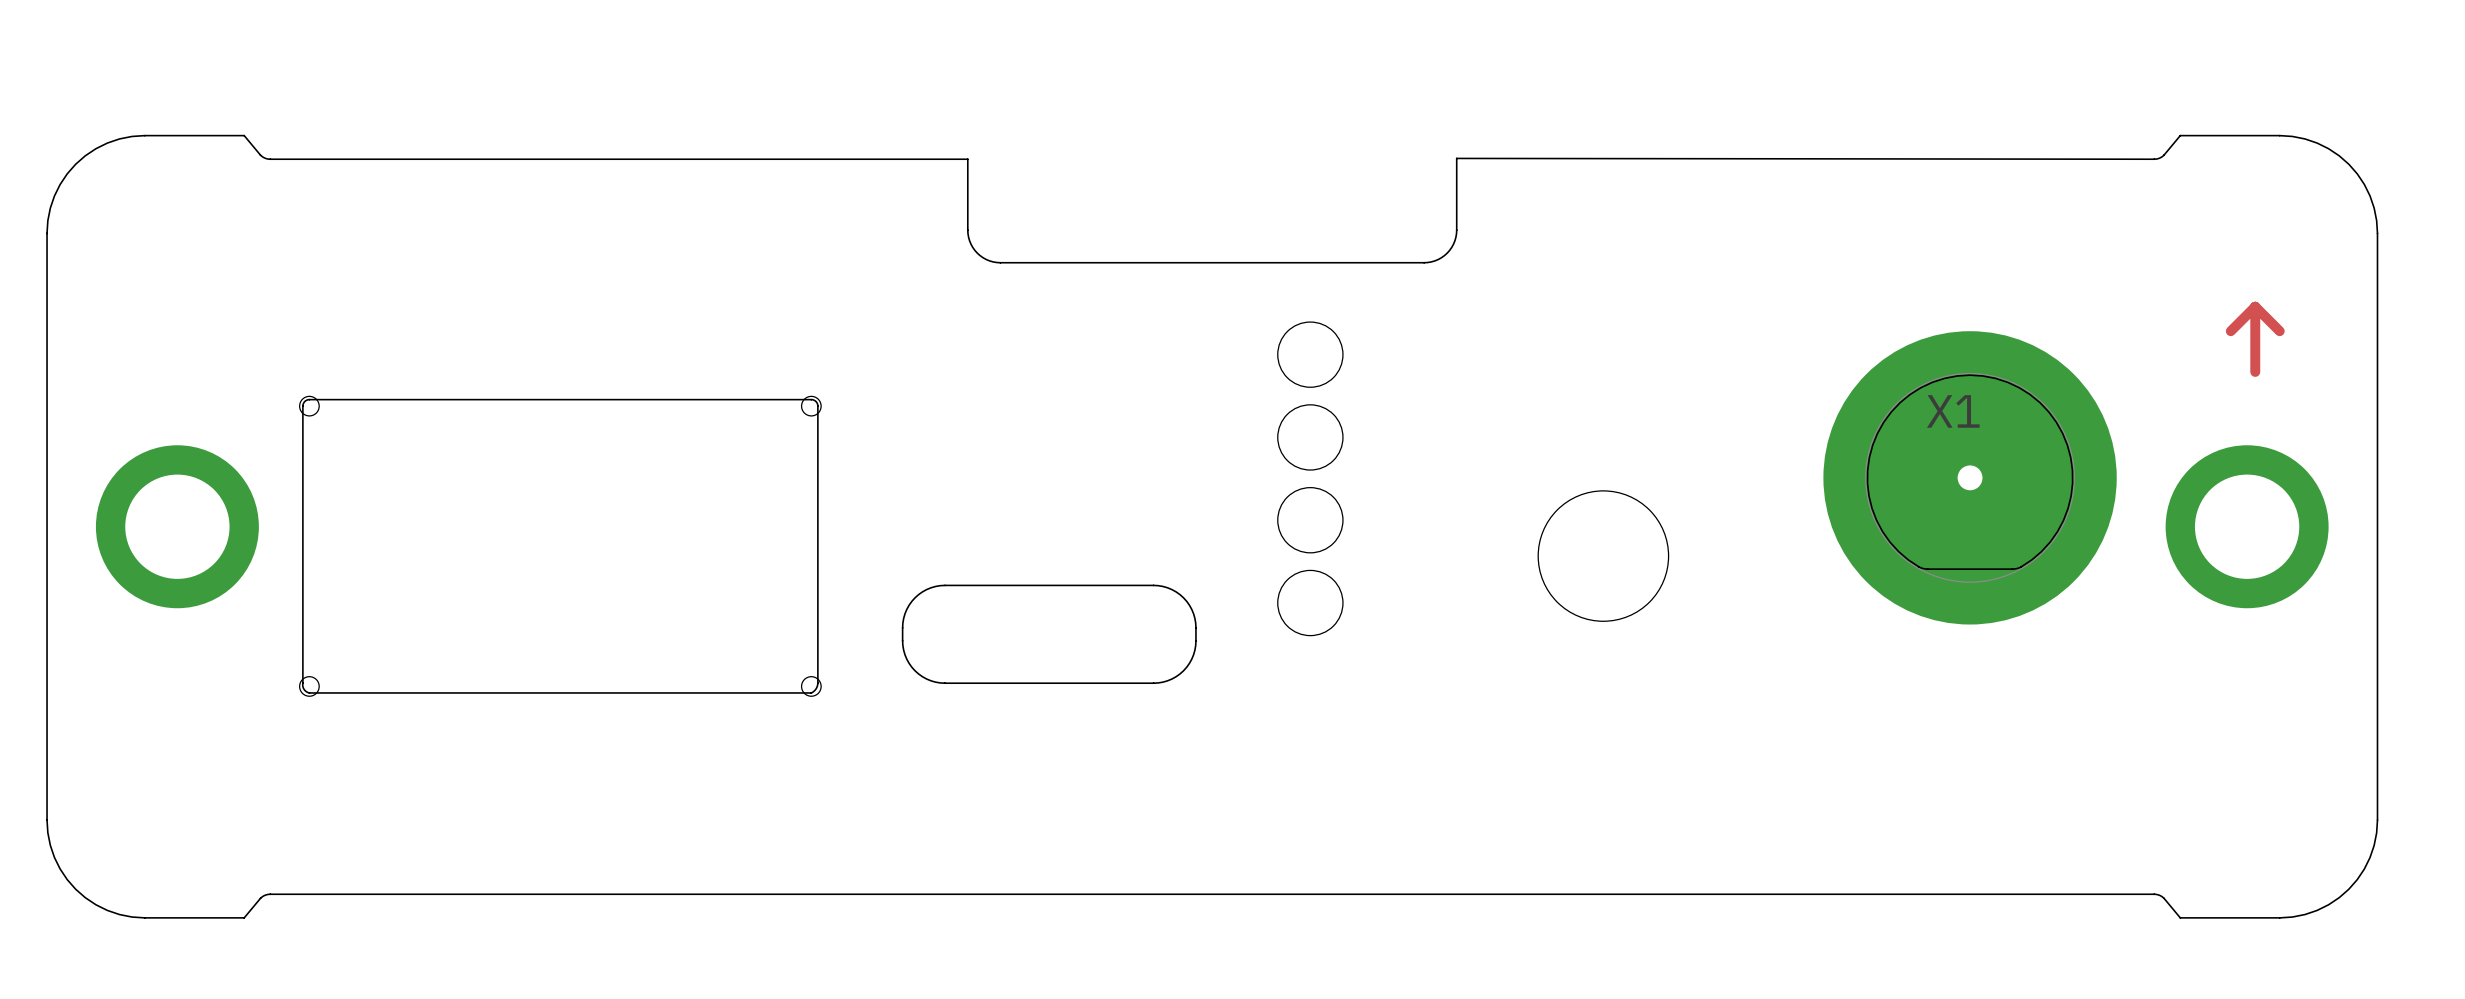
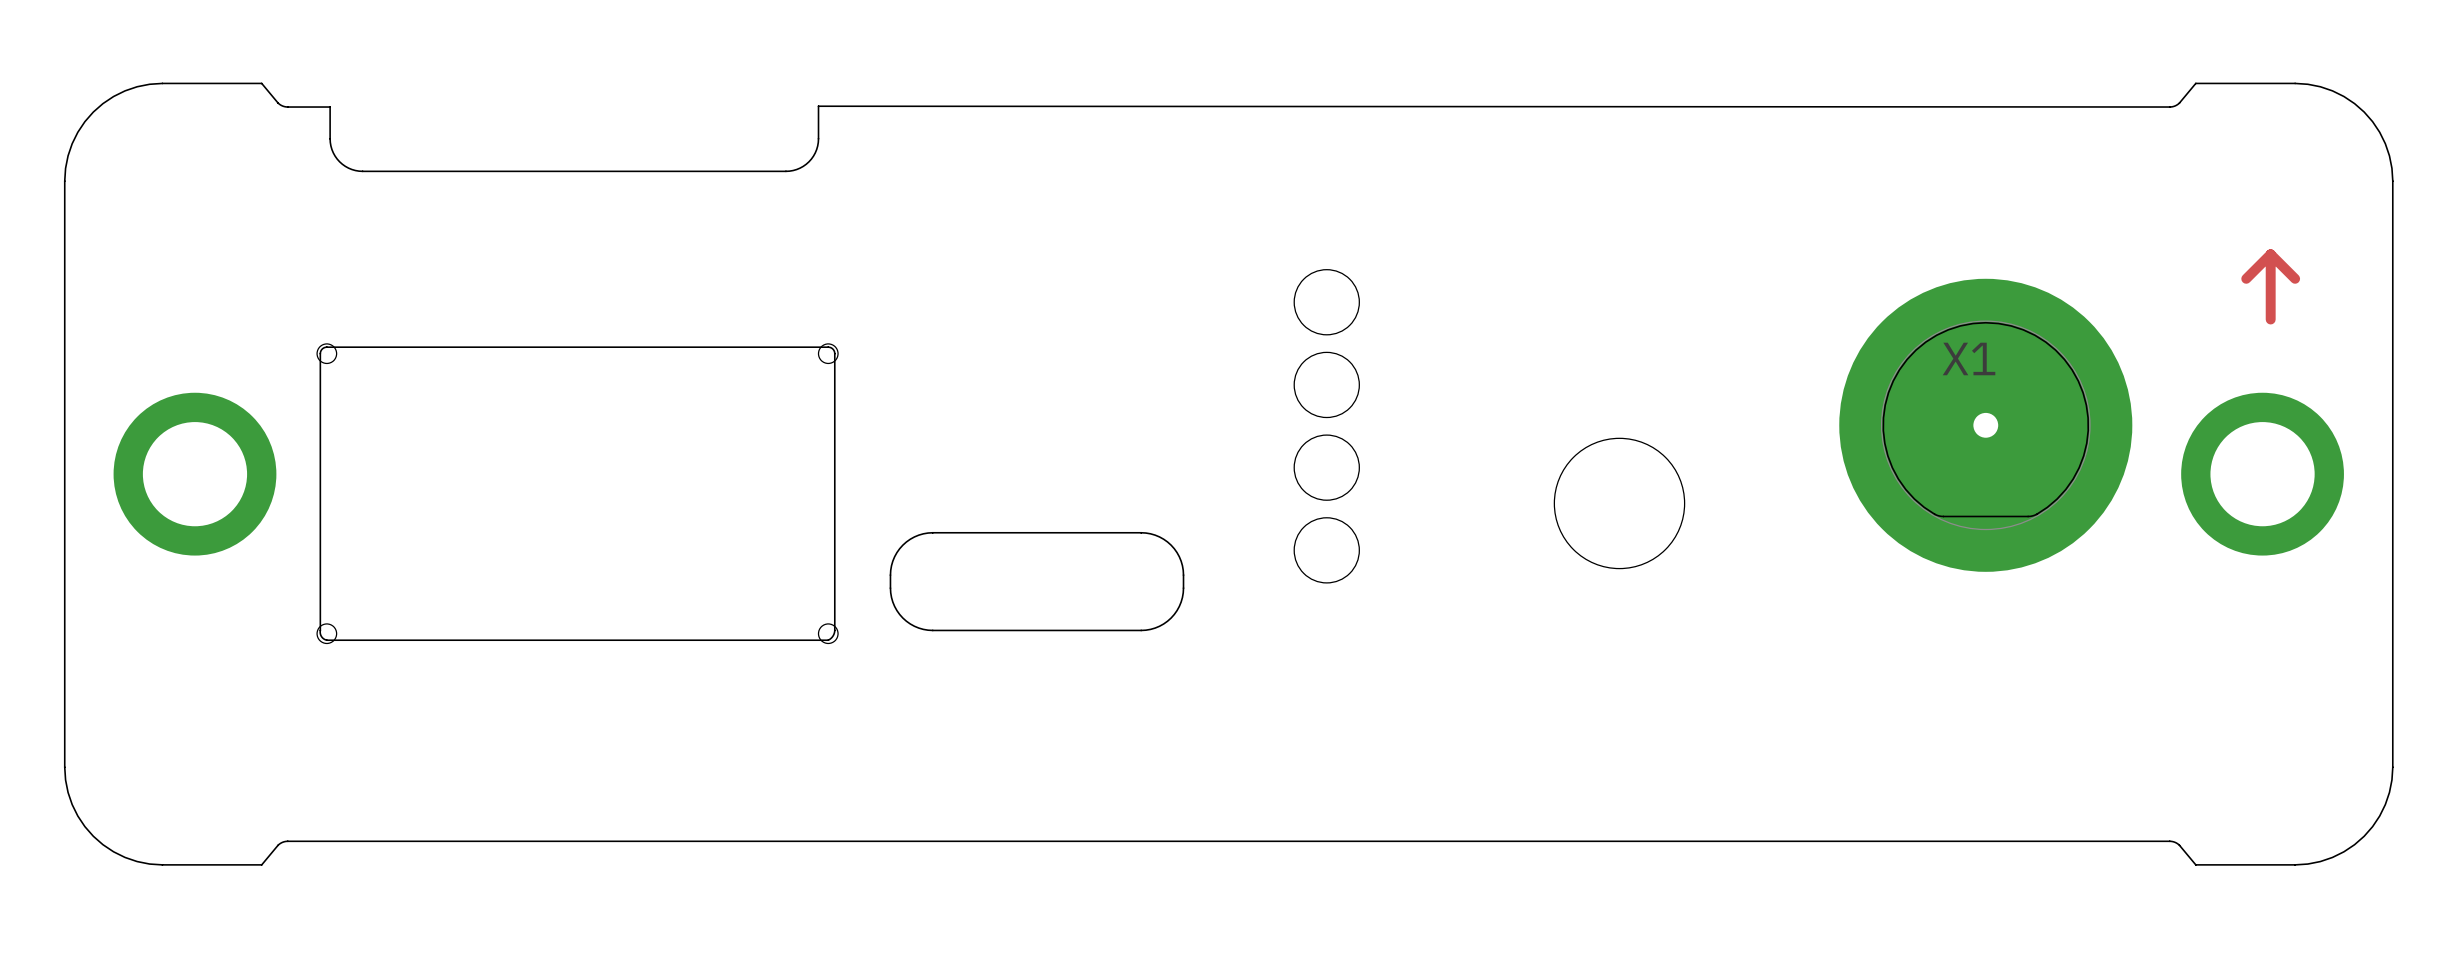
part footprint: [46, 134, 2379, 919] -> [63, 82, 2394, 866]
board edge: (944, 585) (926, 589) (915, 597) (906, 609) (902, 627) (903, 650) (911, 667) (926, 679) (944, 683) -> (961, 532) (928, 533) (910, 539) (896, 552) (892, 561) (890, 575) (892, 602) (896, 610) (906, 621) (918, 628) (928, 630) (961, 630)
board edge: (1124, 585) (1158, 585) (1176, 591) (1183, 597) (1191, 609) (1195, 627) (1193, 654) (1189, 663) (1180, 673) (1167, 680) (1158, 682) (1124, 683) -> (1141, 532) (1159, 536) (1171, 545) (1181, 561) (1183, 575) (1182, 597) (1174, 614) (1159, 626) (1141, 630)

